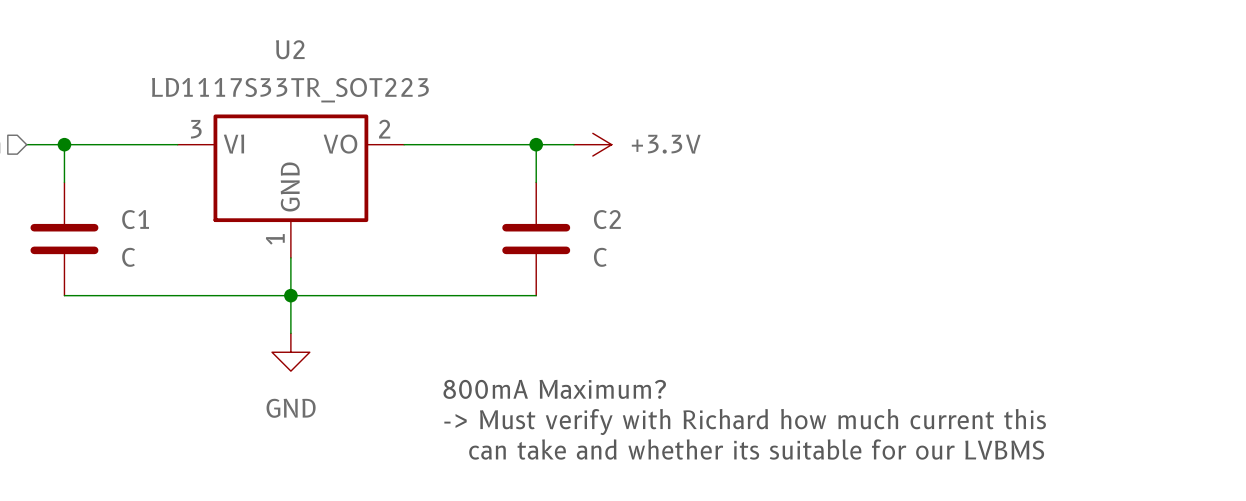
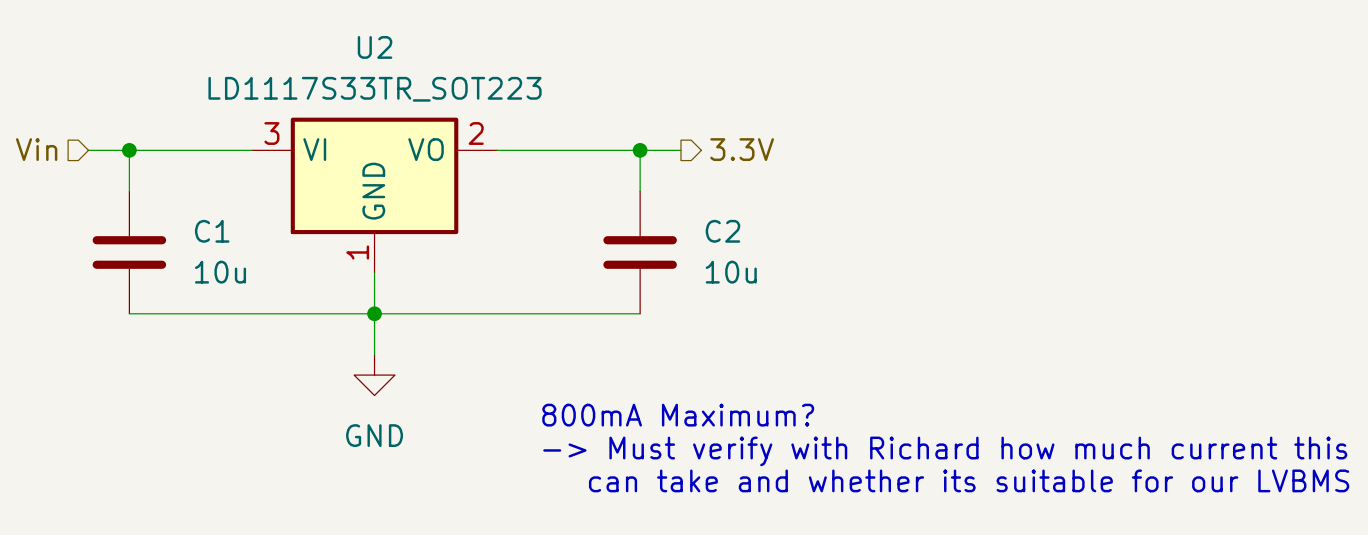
power symbol: +3.3V (592, 144) -> none
hierarchical label: none -> 3.3V (742, 149)
C1 value: C (128, 257) -> 10u (220, 272)
C2 value: C (600, 257) -> 10u (731, 272)

